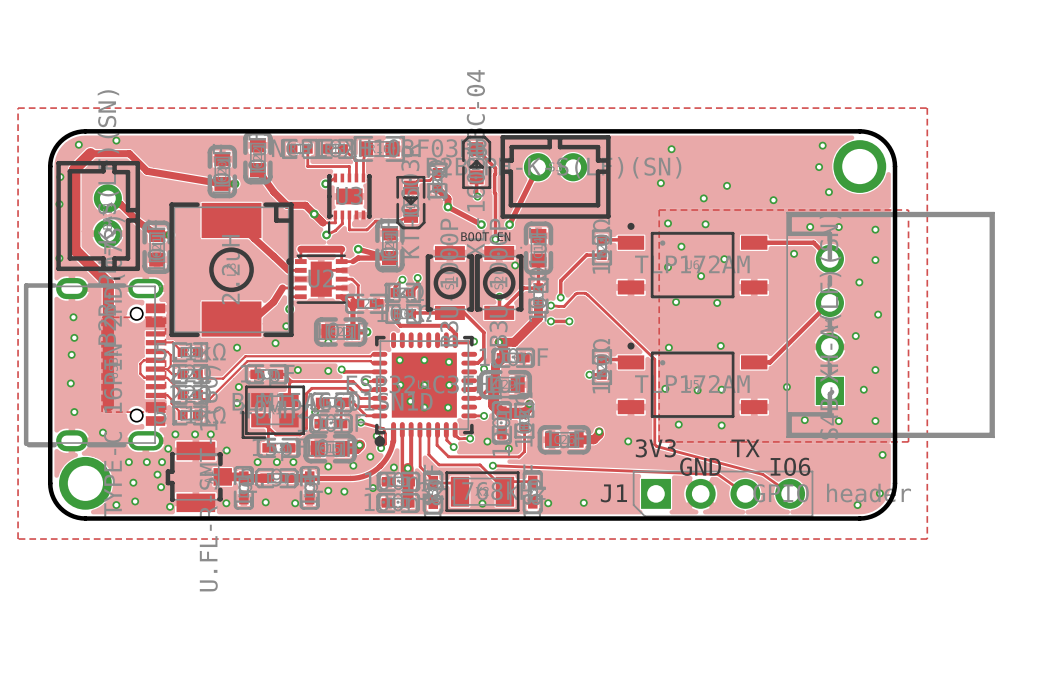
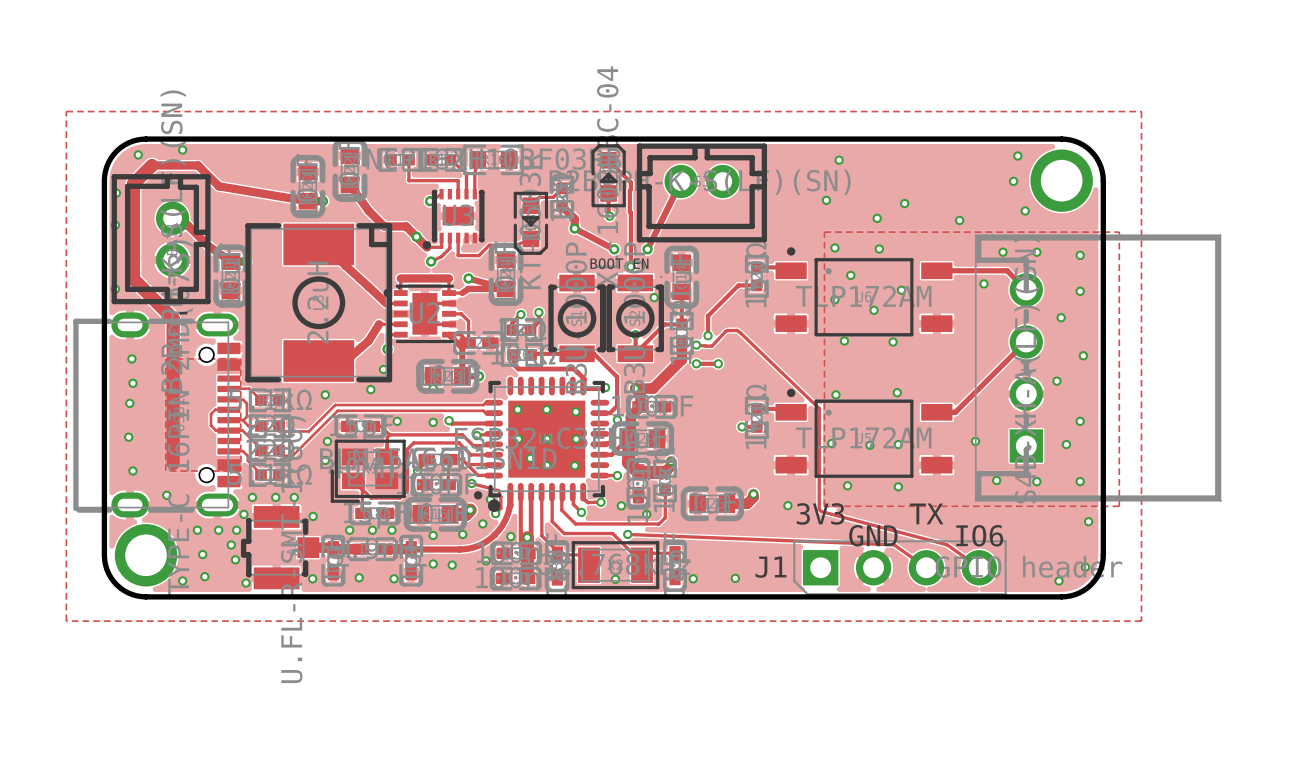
part footprint: [327, 173, 372, 234] -> [422, 189, 485, 250]
part footprint: [371, 332, 478, 447] -> [473, 376, 610, 512]

